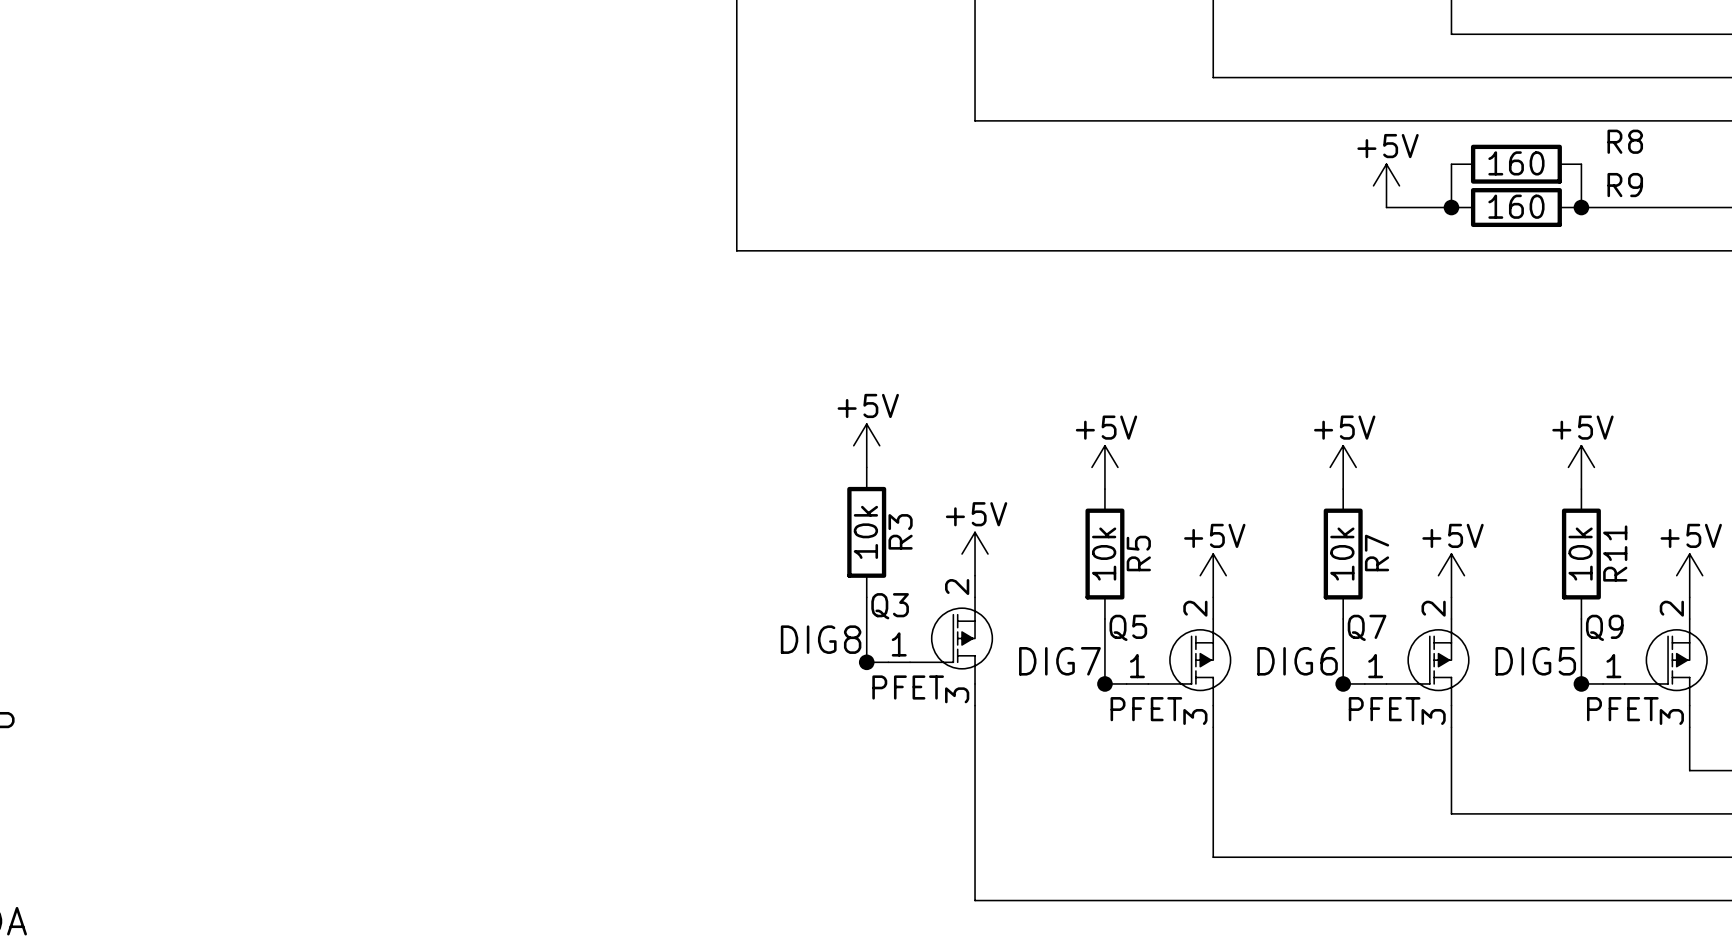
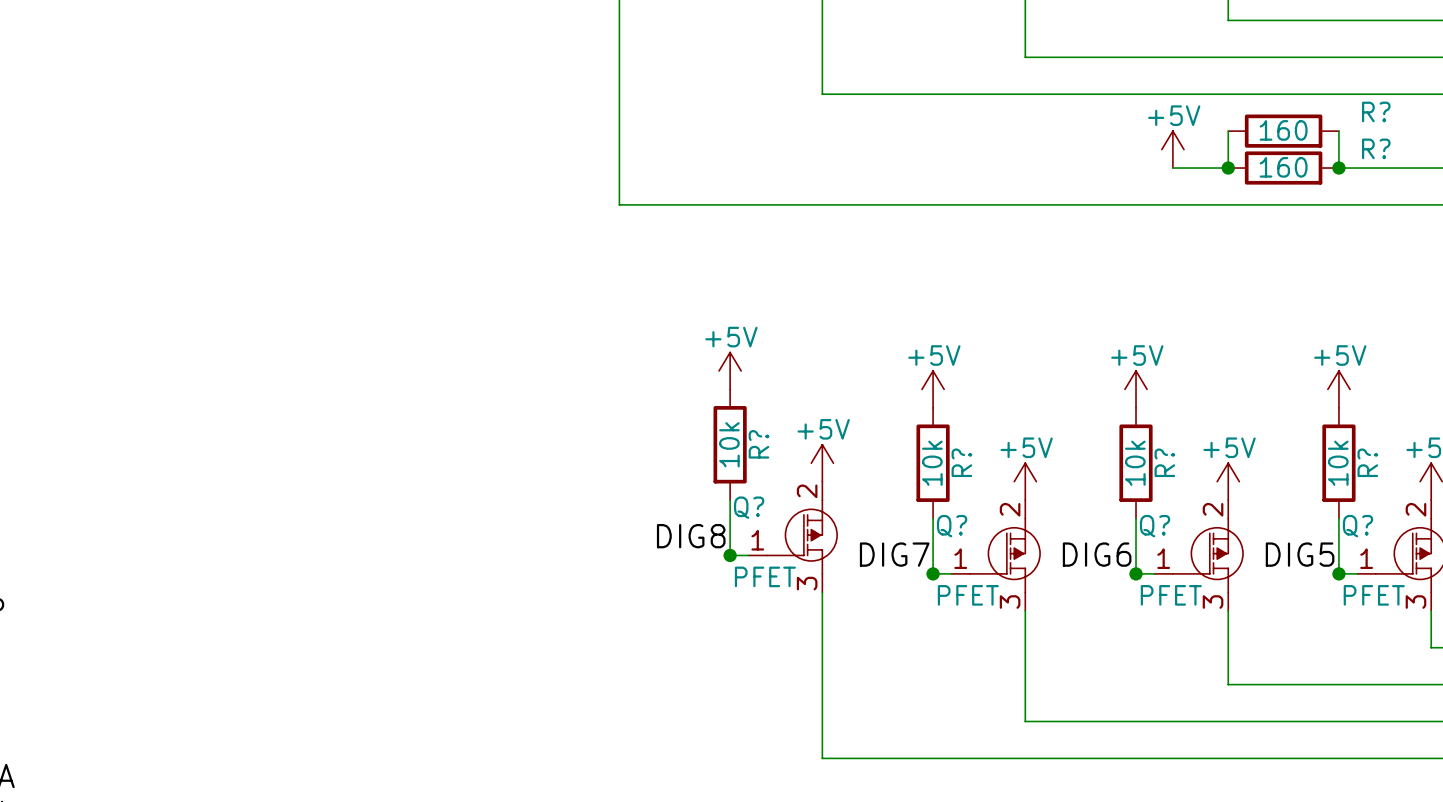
R8 name: R8 (1625, 141) -> R? (1376, 111)
R9 name: R9 (1625, 185) -> R? (1376, 148)
R3 name: R3 (900, 531) -> R? (758, 444)
R5 name: R5 (1138, 553) -> R? (961, 462)
R7 name: R7 (1377, 553) -> R? (1164, 462)
R11 name: R11 (1615, 553) -> R? (1367, 462)
Q3 name: Q3 (890, 606) -> Q? (749, 507)
Q5 name: Q5 (1128, 627) -> Q? (952, 526)
Q7 name: Q7 (1367, 627) -> Q? (1155, 526)
Q9 name: Q9 (1604, 627) -> Q? (1357, 526)

